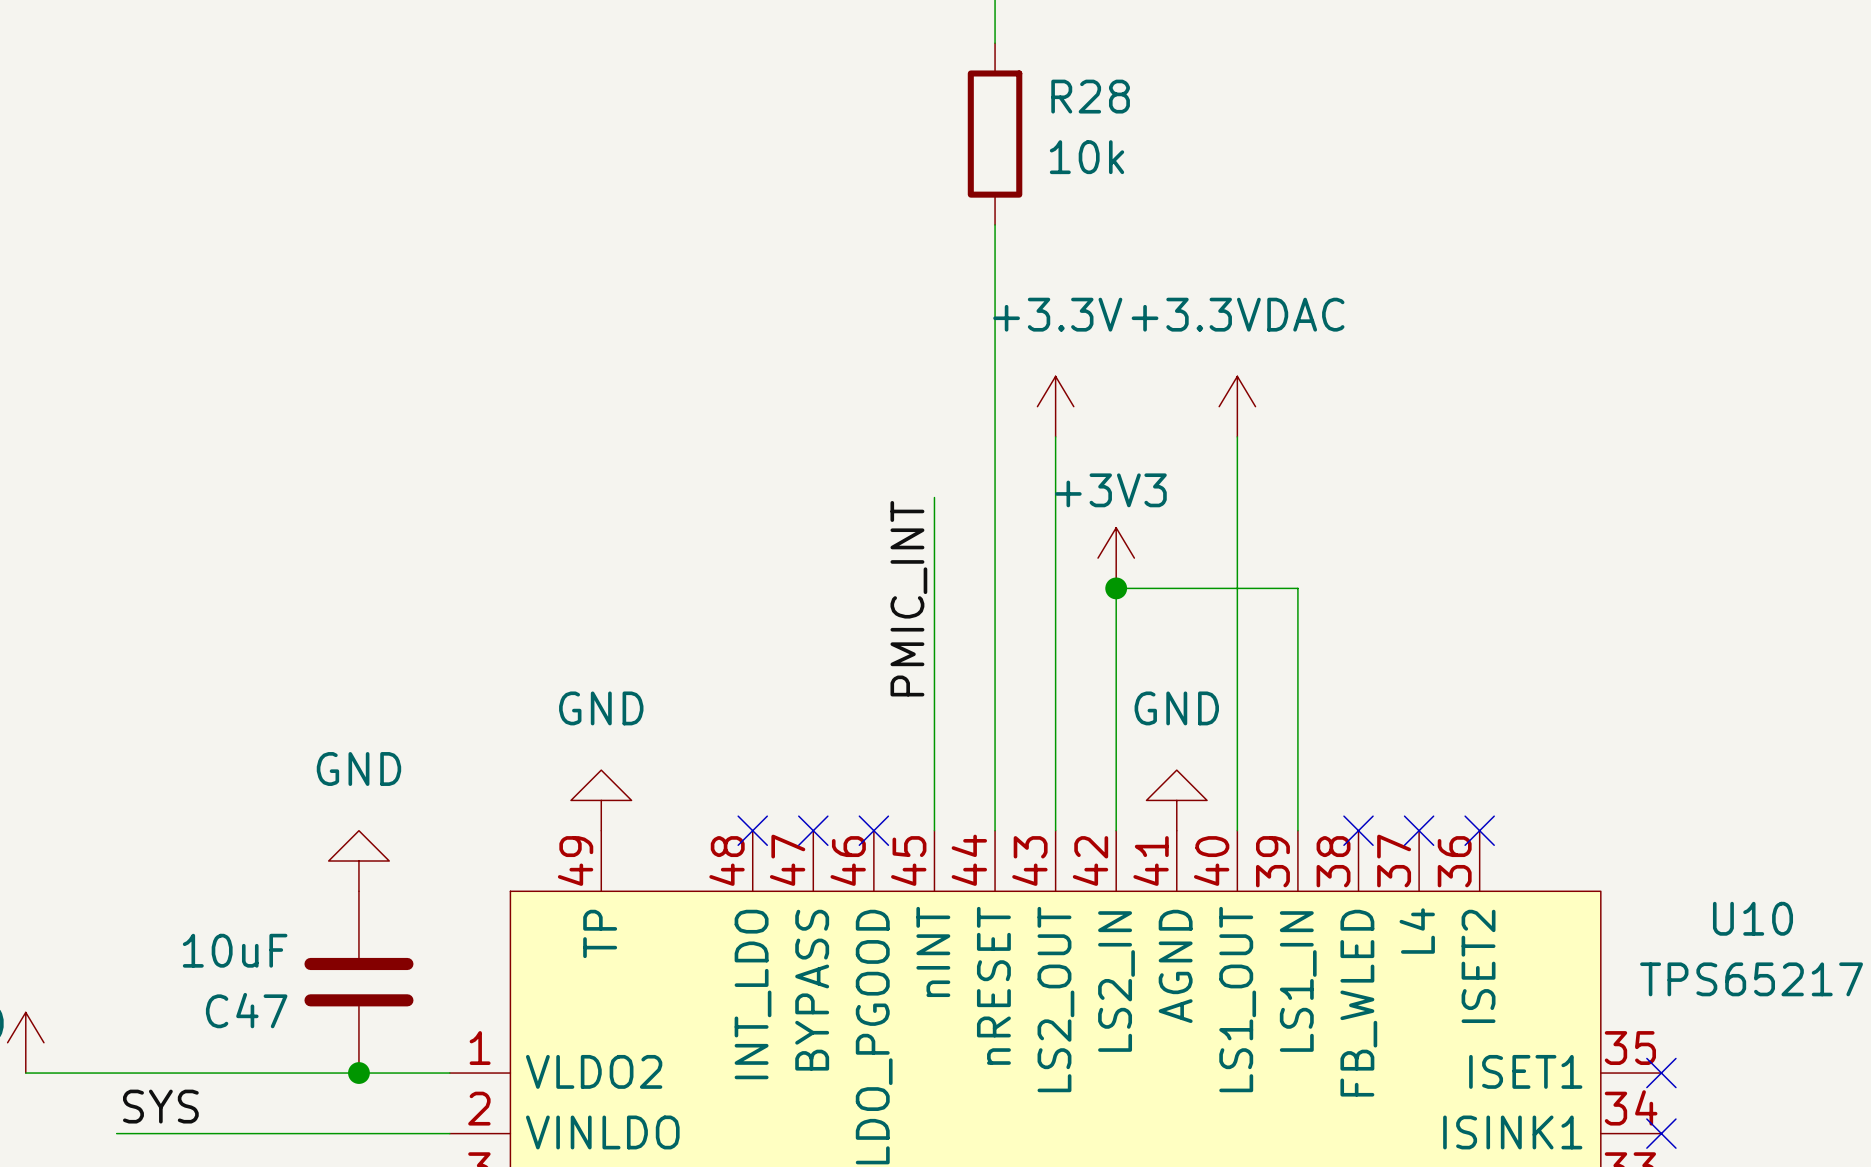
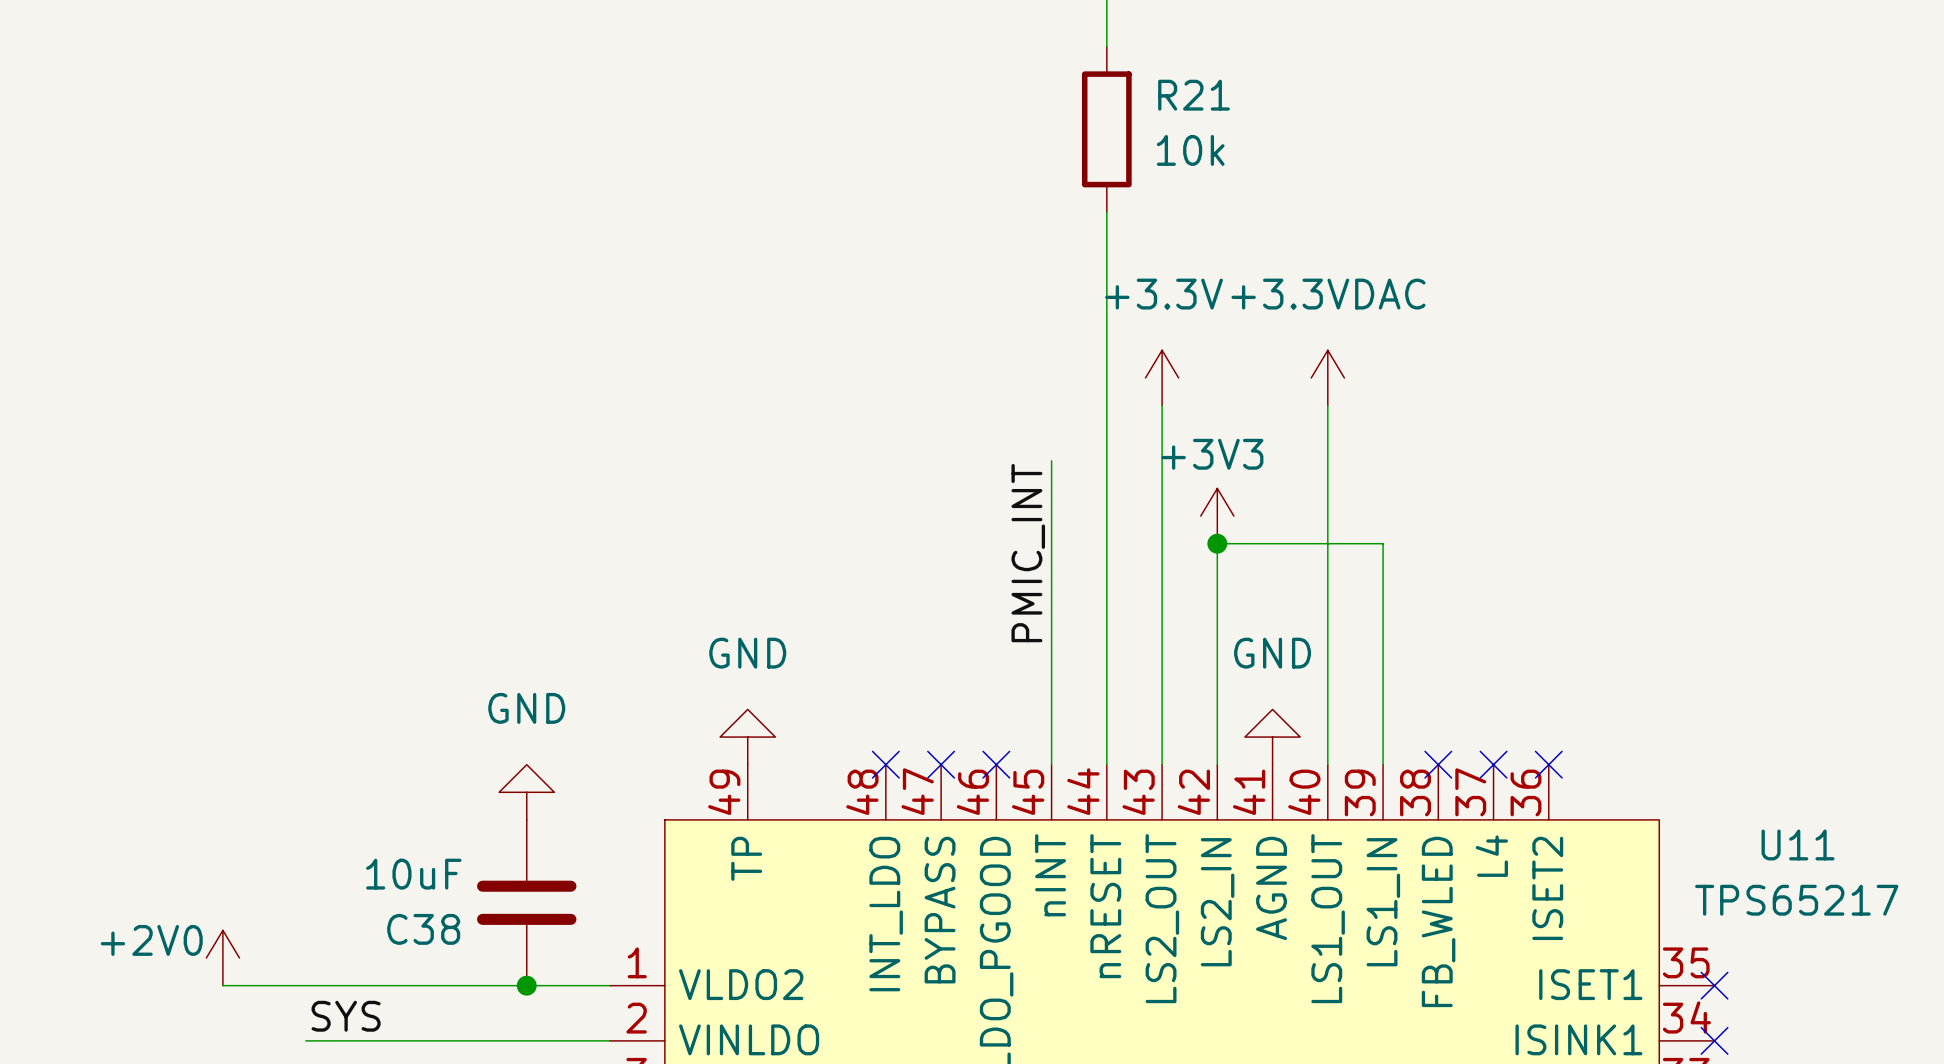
R28 name: R28 (1090, 96) -> R21 (1193, 95)
U10 name: U10 (1752, 918) -> U11 (1798, 844)
C47 name: C47 (246, 1010) -> C38 (423, 929)

